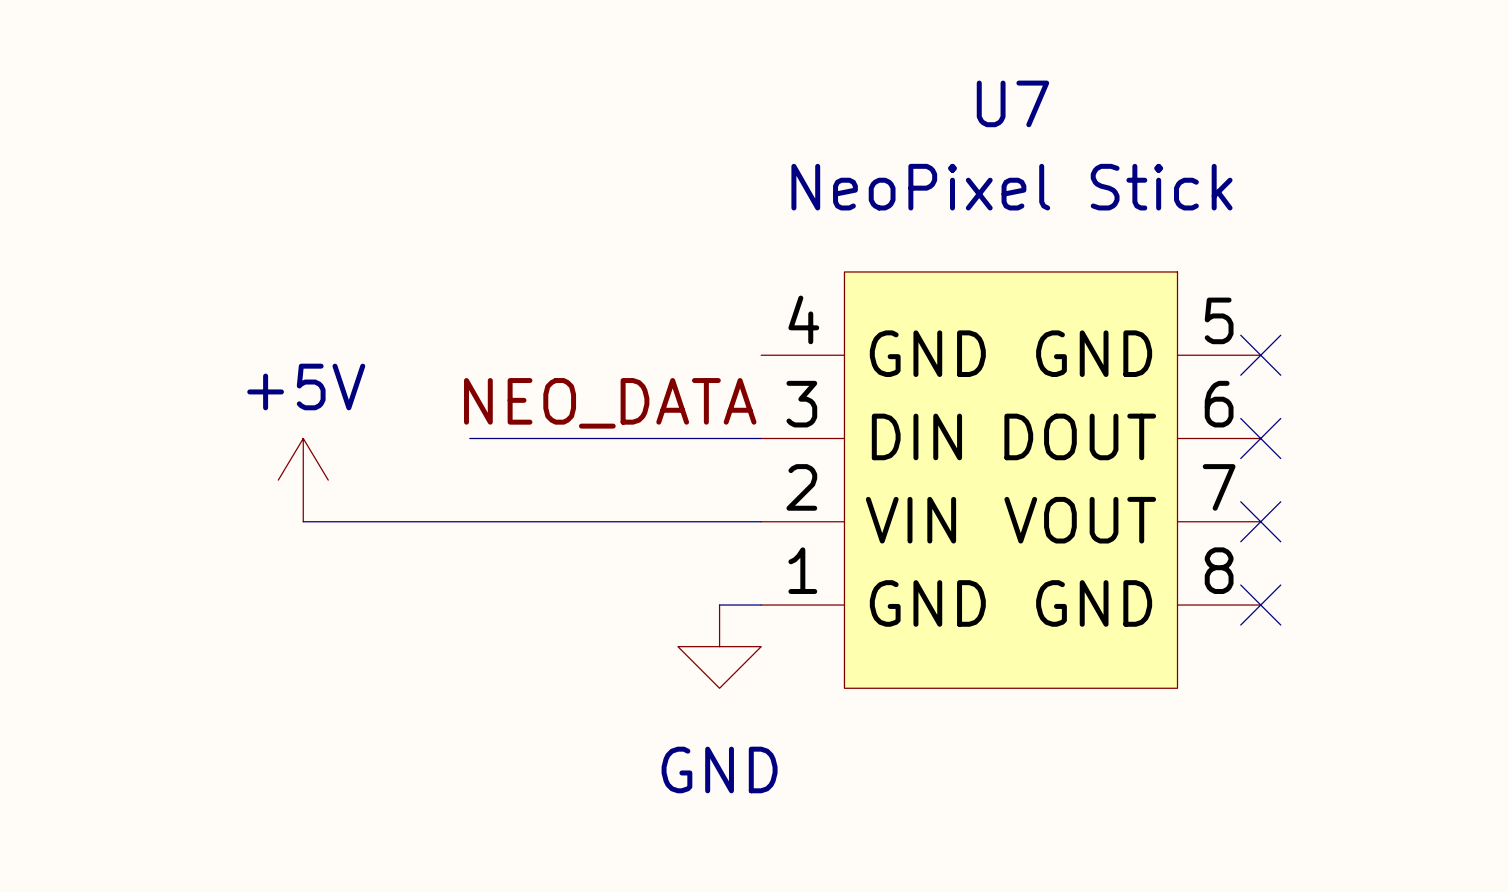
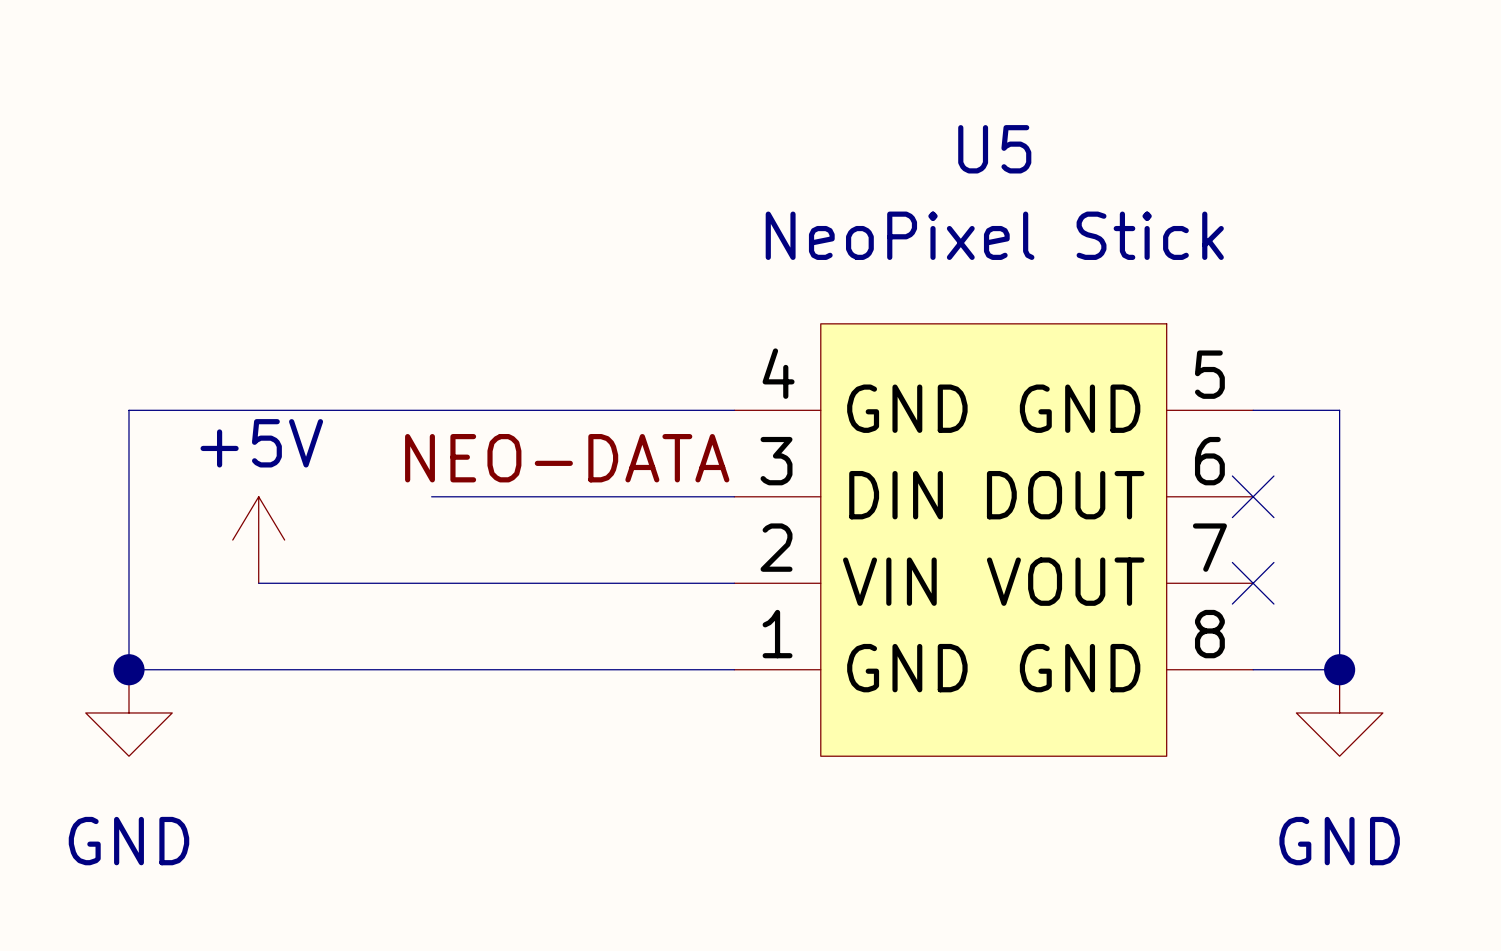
U7 name: U7 (1012, 103) -> U5 (994, 149)
wire: none -> (734, 410) (128, 410) (128, 669) (691, 669)
wire: none -> (1253, 410) (1339, 410) (1339, 669) (1253, 669)
no-connect mark: (1260, 355) -> none
label: NEO_DATA (610, 403) -> NEO-DATA (567, 458)
junction: none -> (128, 669)
no-connect mark: (1260, 605) -> none
junction: none -> (1339, 669)
power symbol: none -> GND (128, 712)
power symbol: GND (719, 646) -> none
power symbol: none -> GND (1339, 712)

